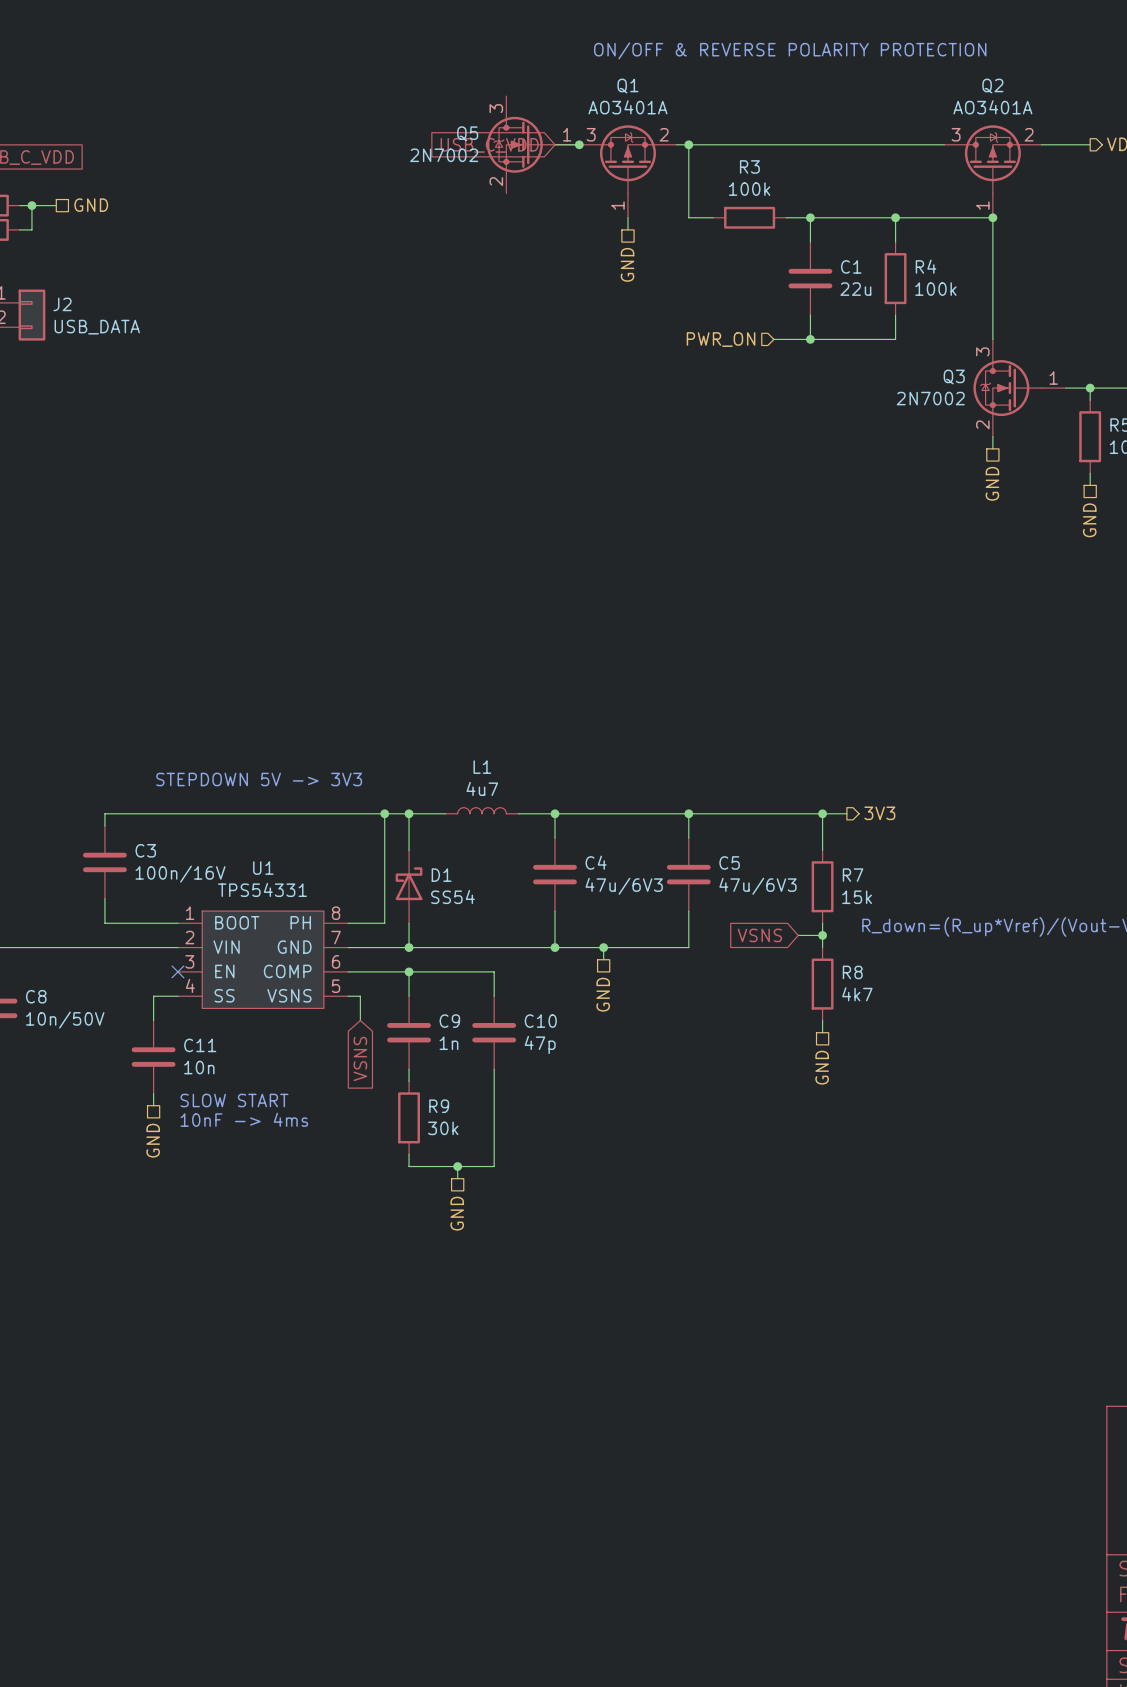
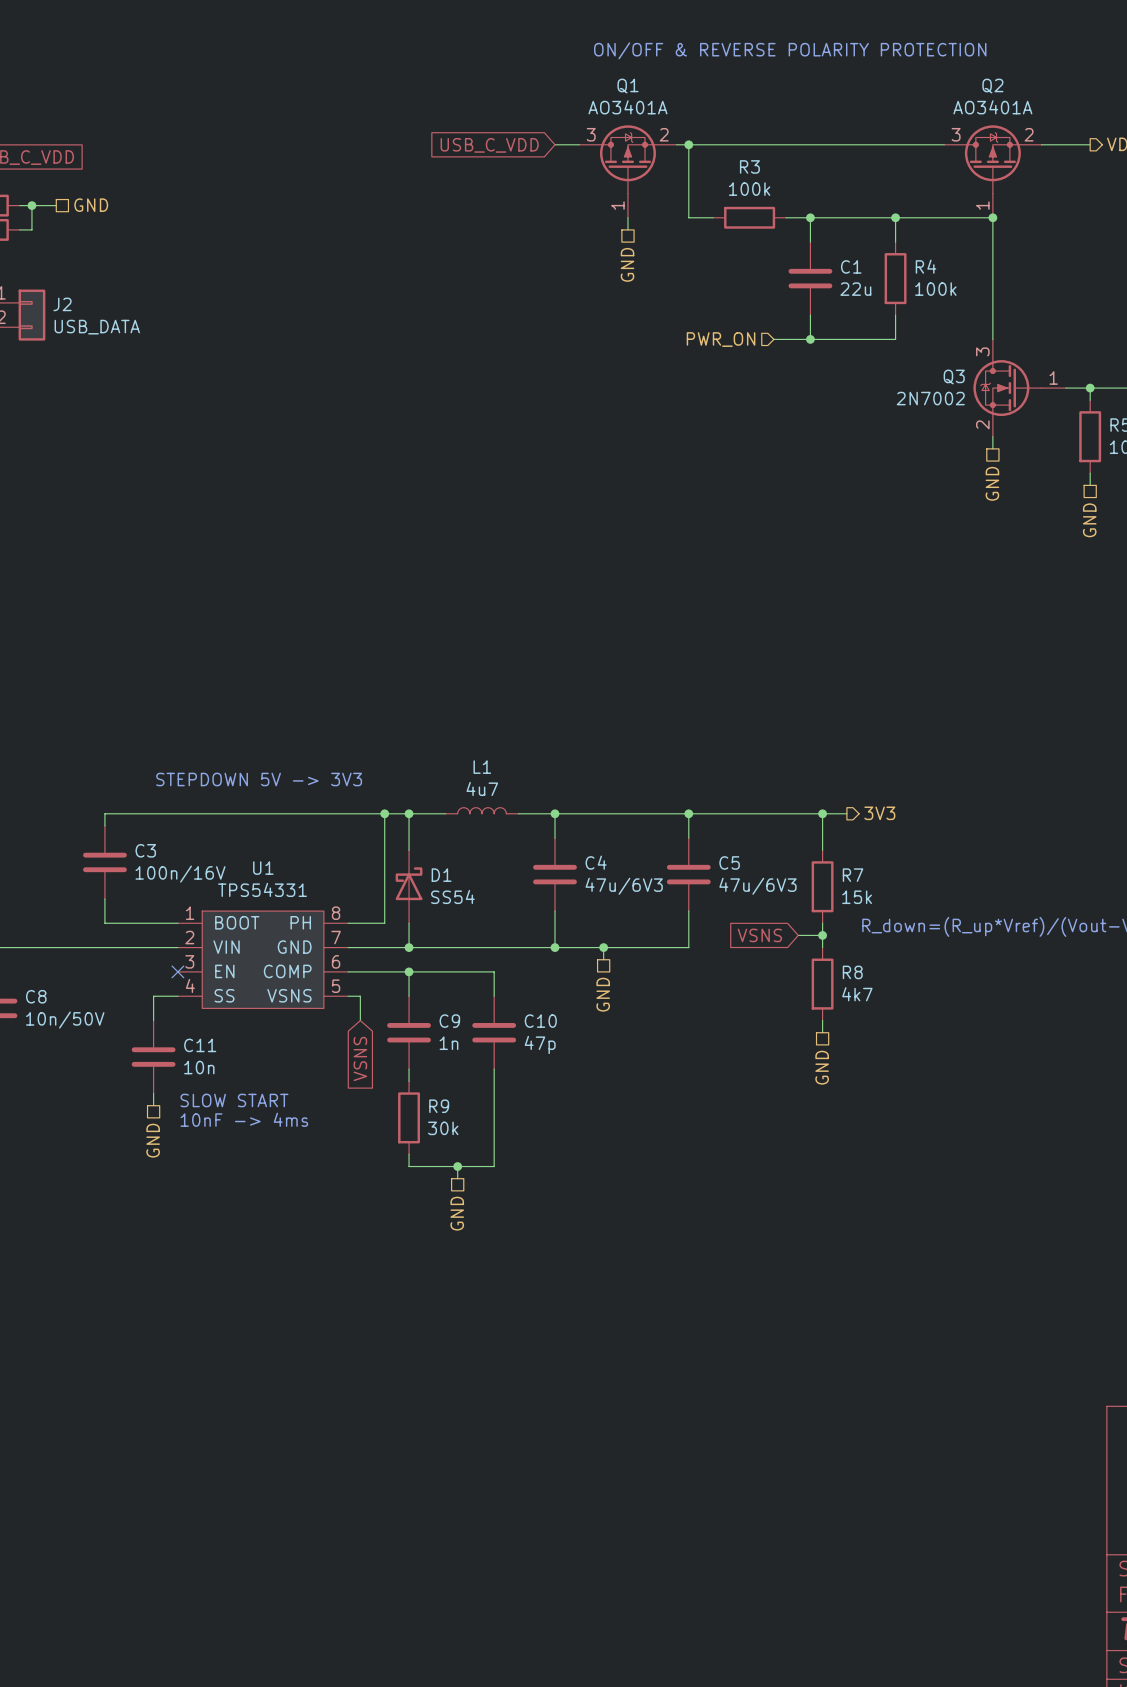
Q5: 2N7002 (533, 144) -> none
junction: (579, 144) -> none

